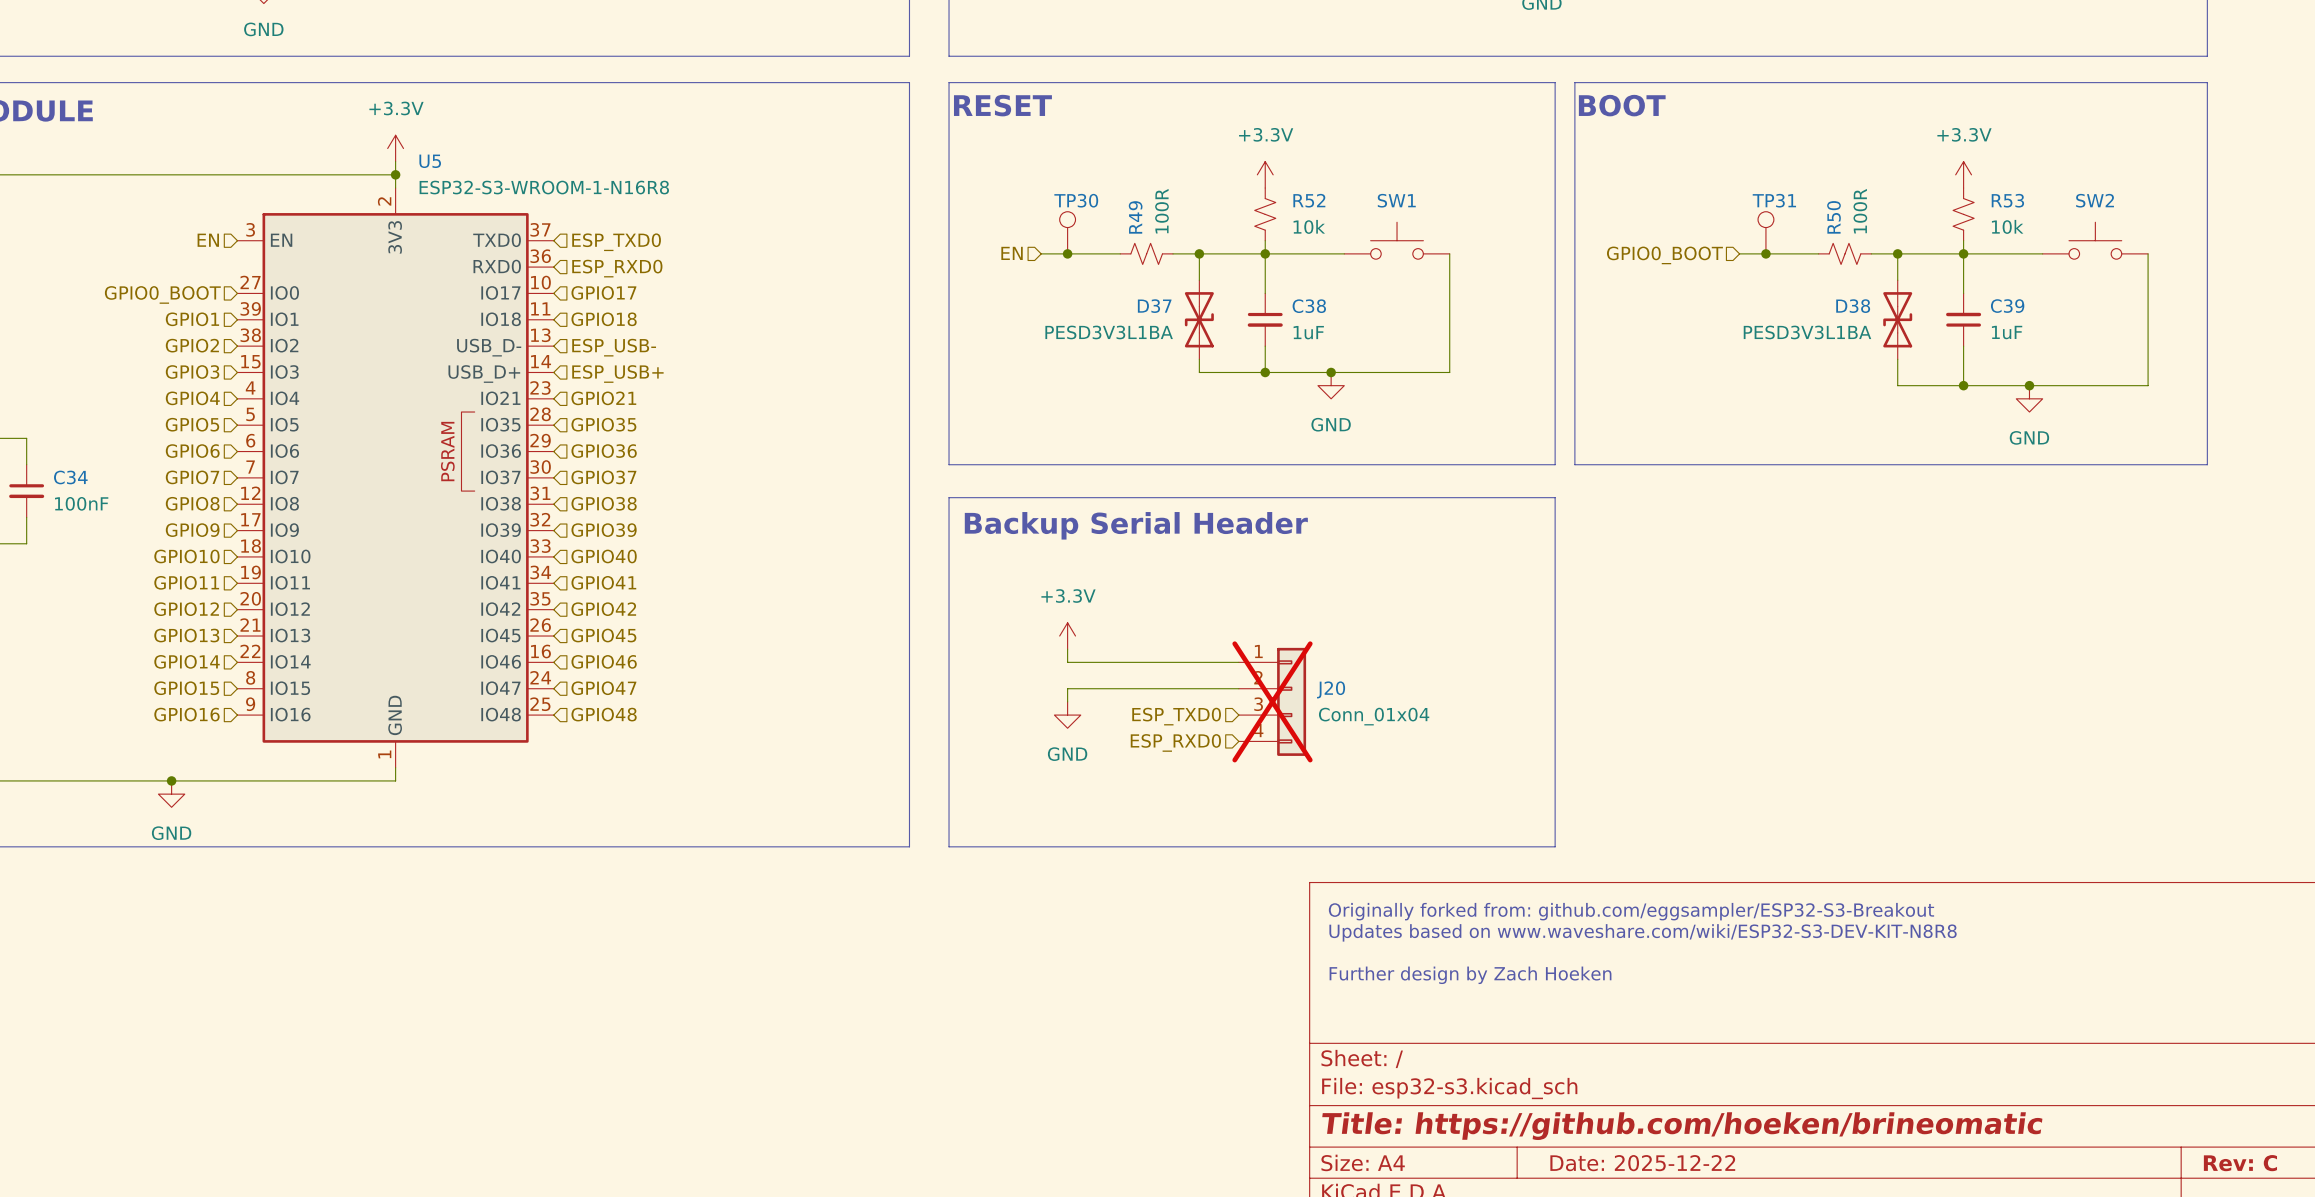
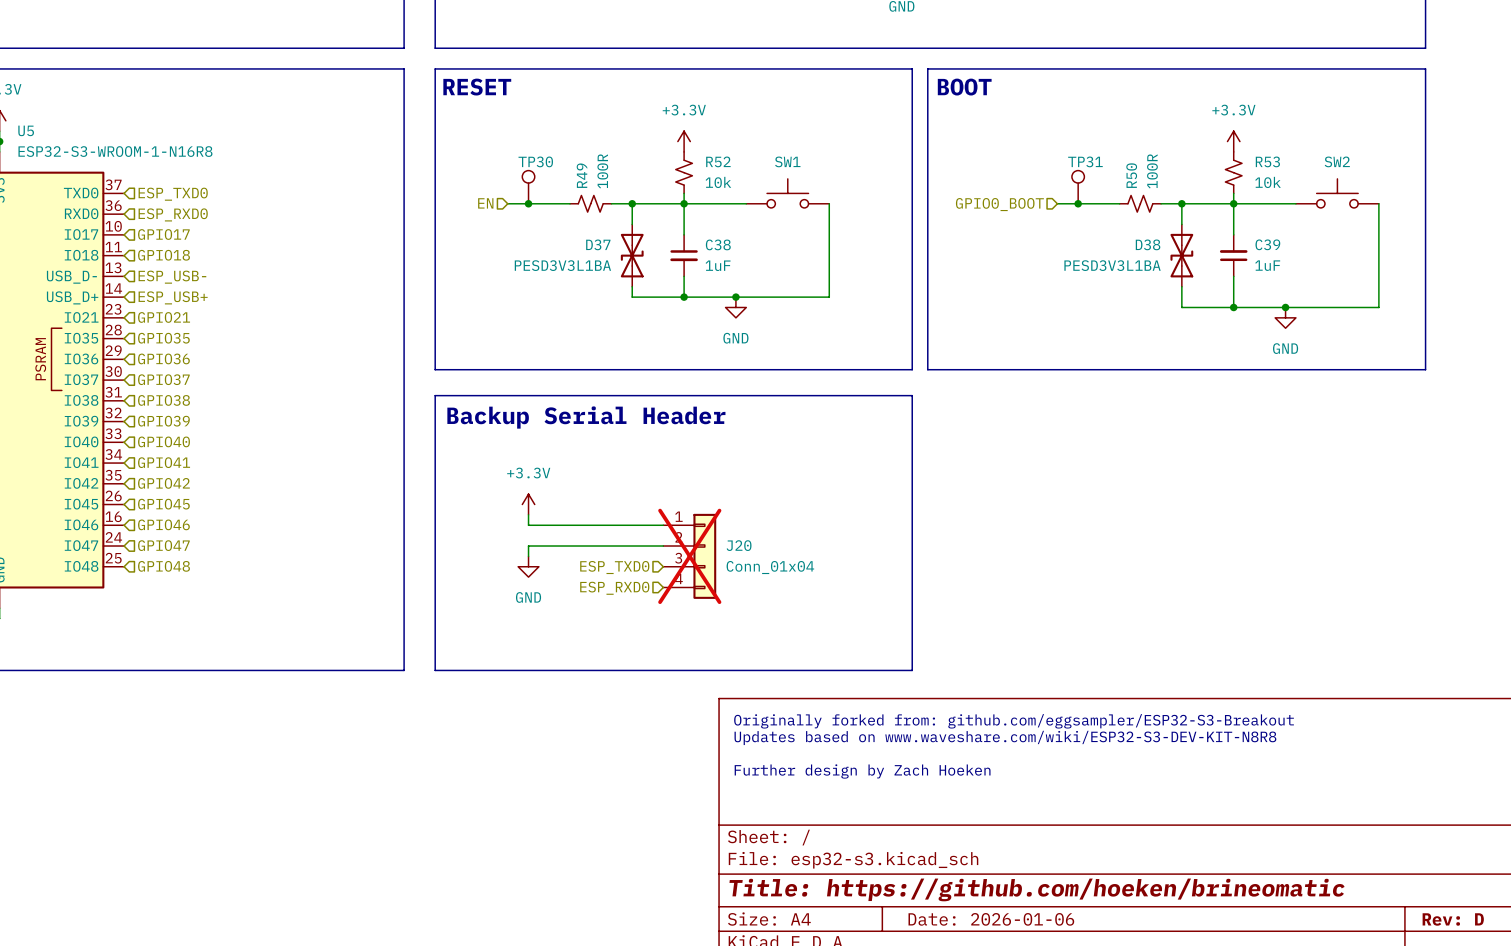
title block: Date: 2025-12-22 (1642, 1163) -> Date: 2026-01-06 (991, 919)
title block: Rev: C (2240, 1163) -> Rev: D (1453, 919)

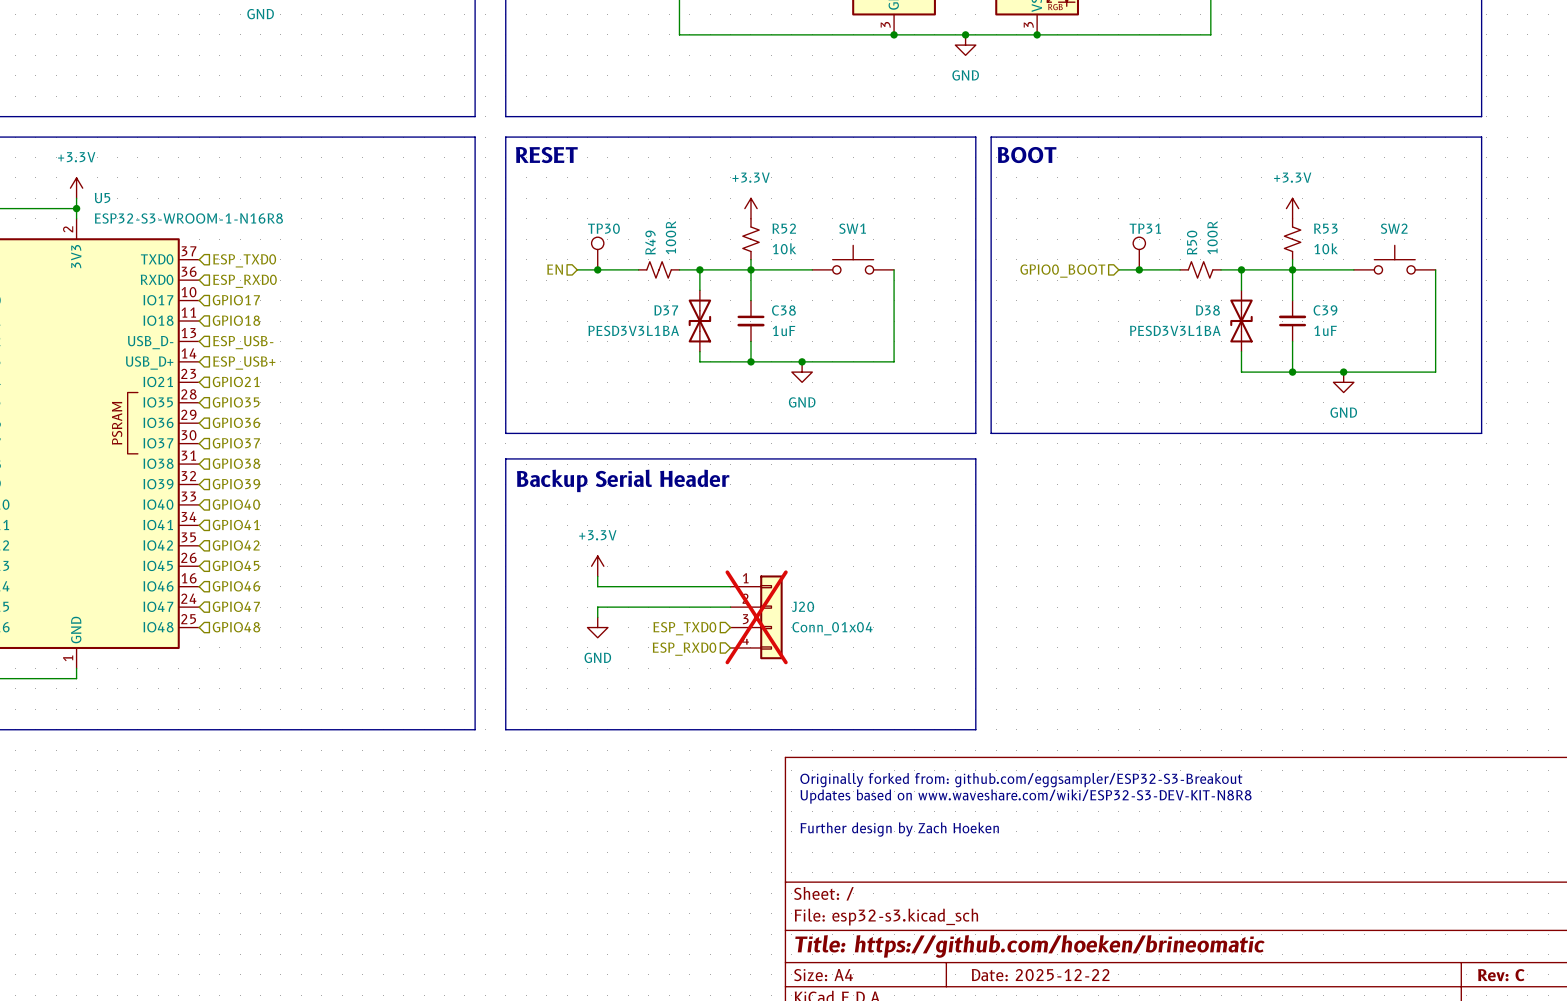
title block: Date: 2026-01-06 (991, 919) -> Date: 2025-12-22 (1040, 975)
title block: Rev: D (1453, 919) -> Rev: C (1501, 975)

